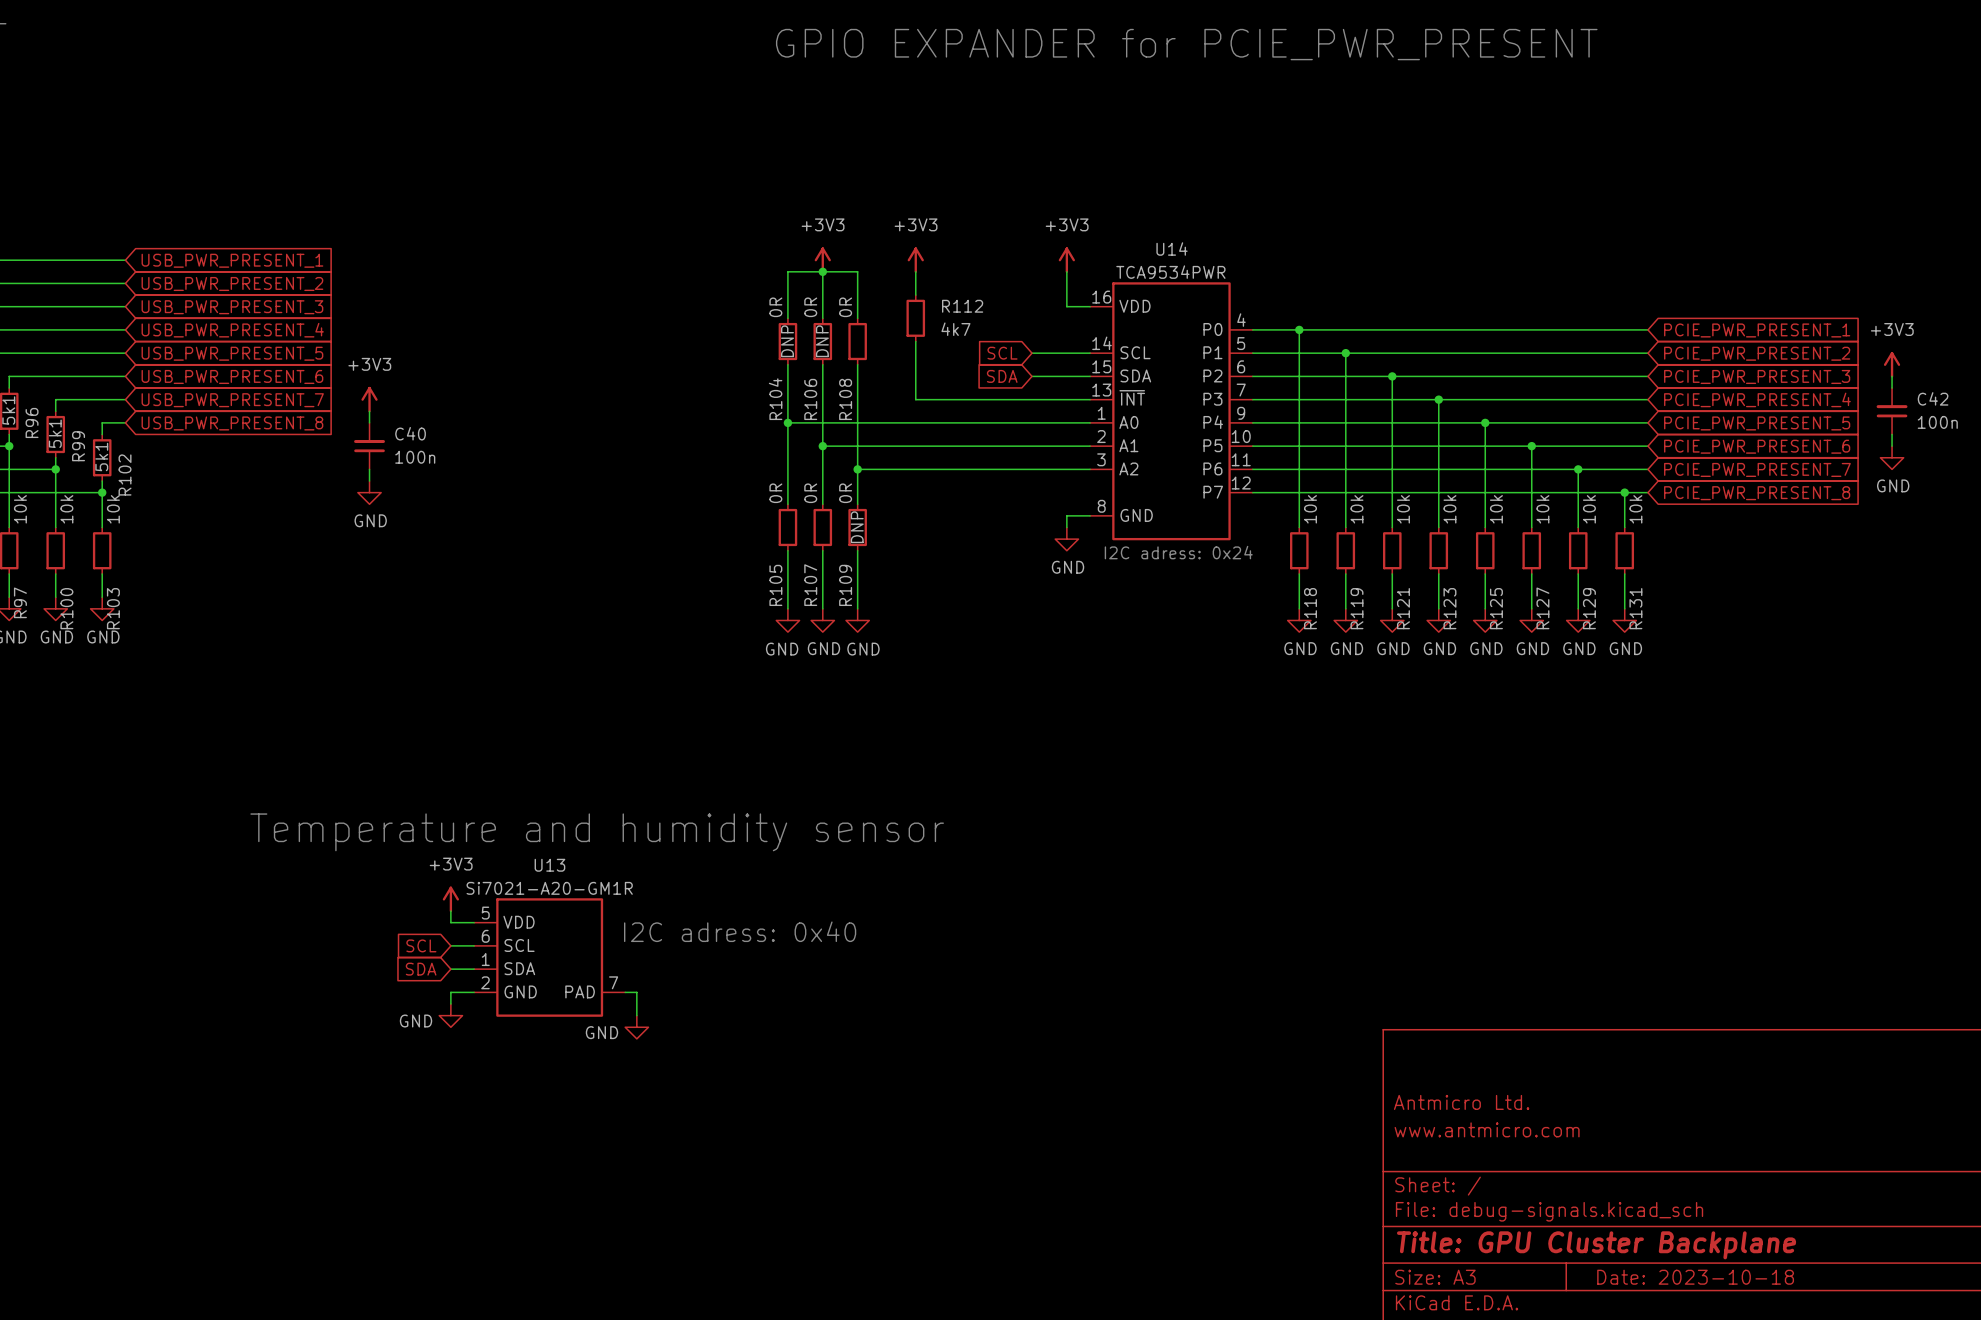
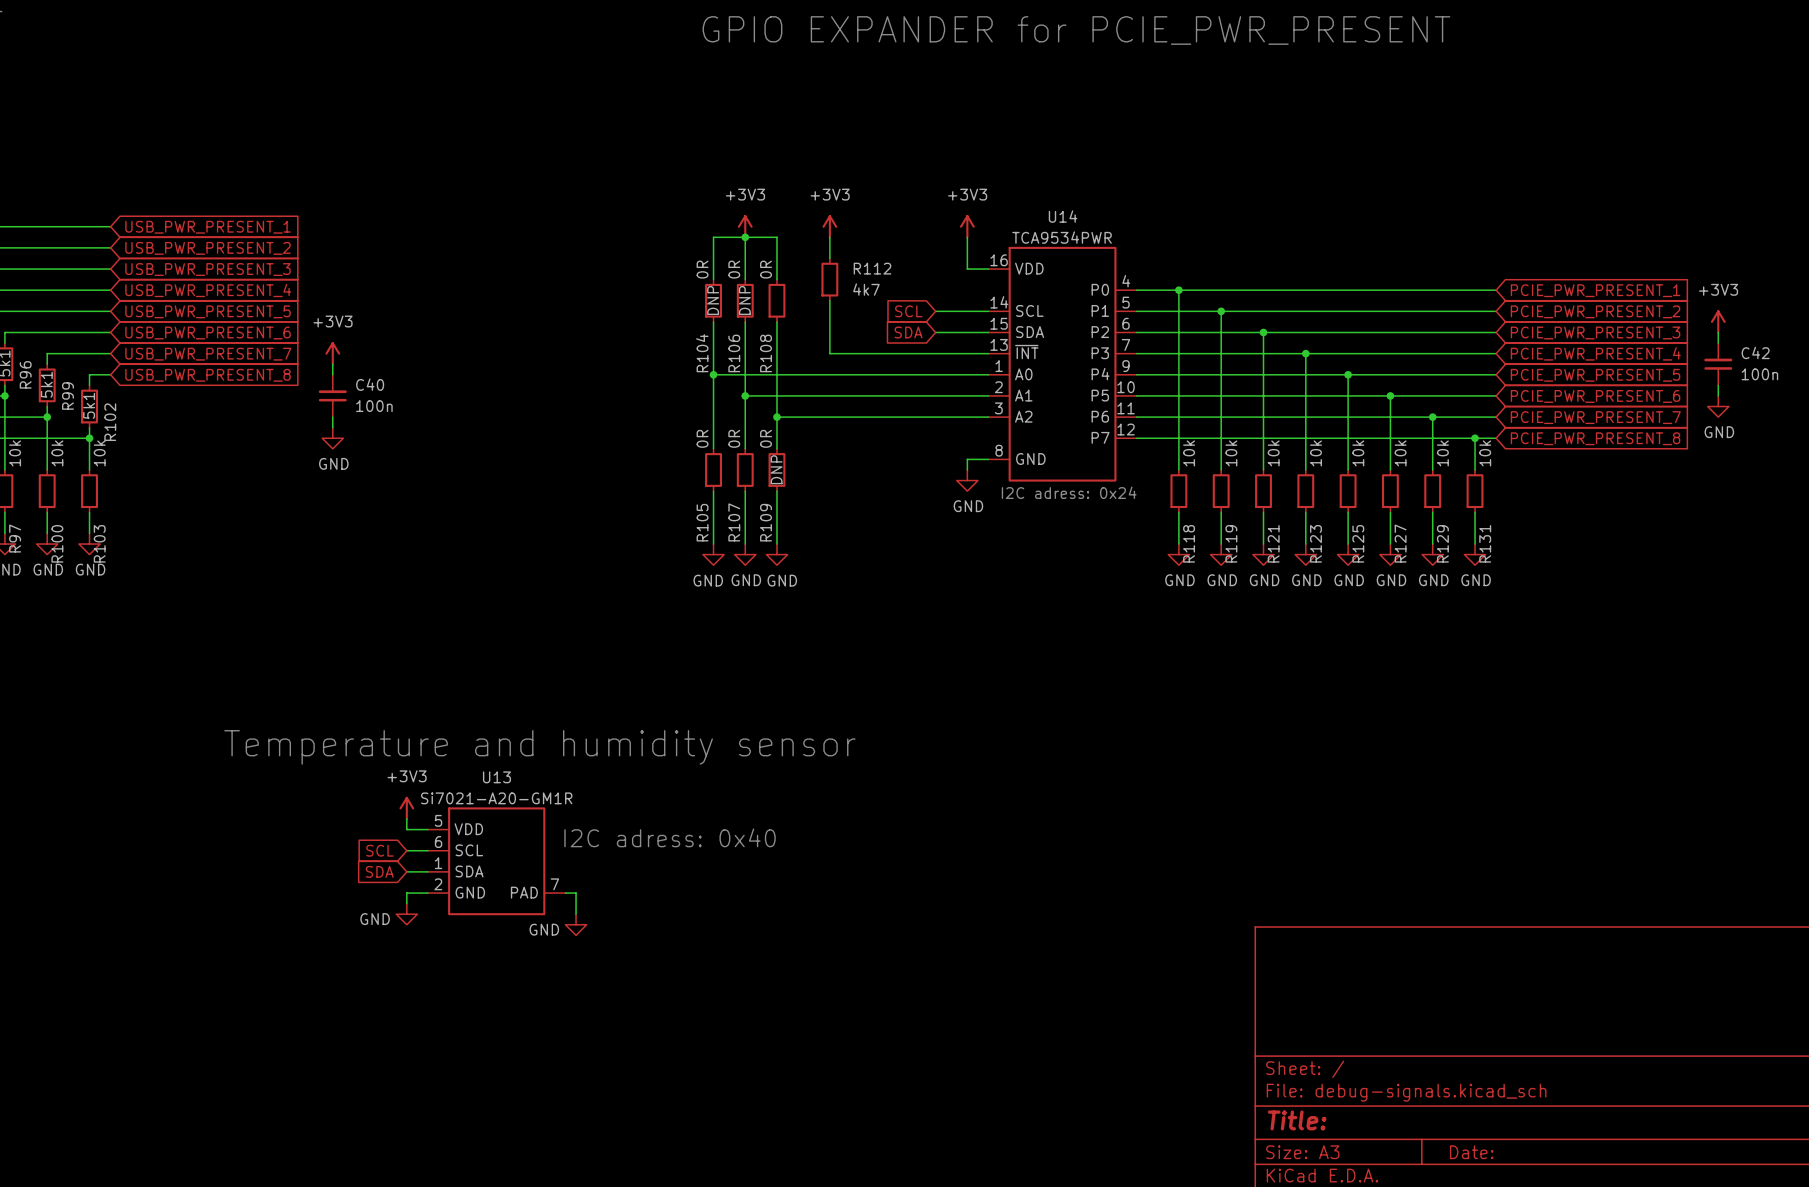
title block: Antmicro Ltd. (1461, 1102) -> none
title block: www.antmicro.com (1487, 1129) -> none
title block: Title: GPU Cluster Backplane (1596, 1245) -> Title: (1297, 1120)
title block: Date: 2023-10-18 (1695, 1277) -> Date: (1471, 1152)

